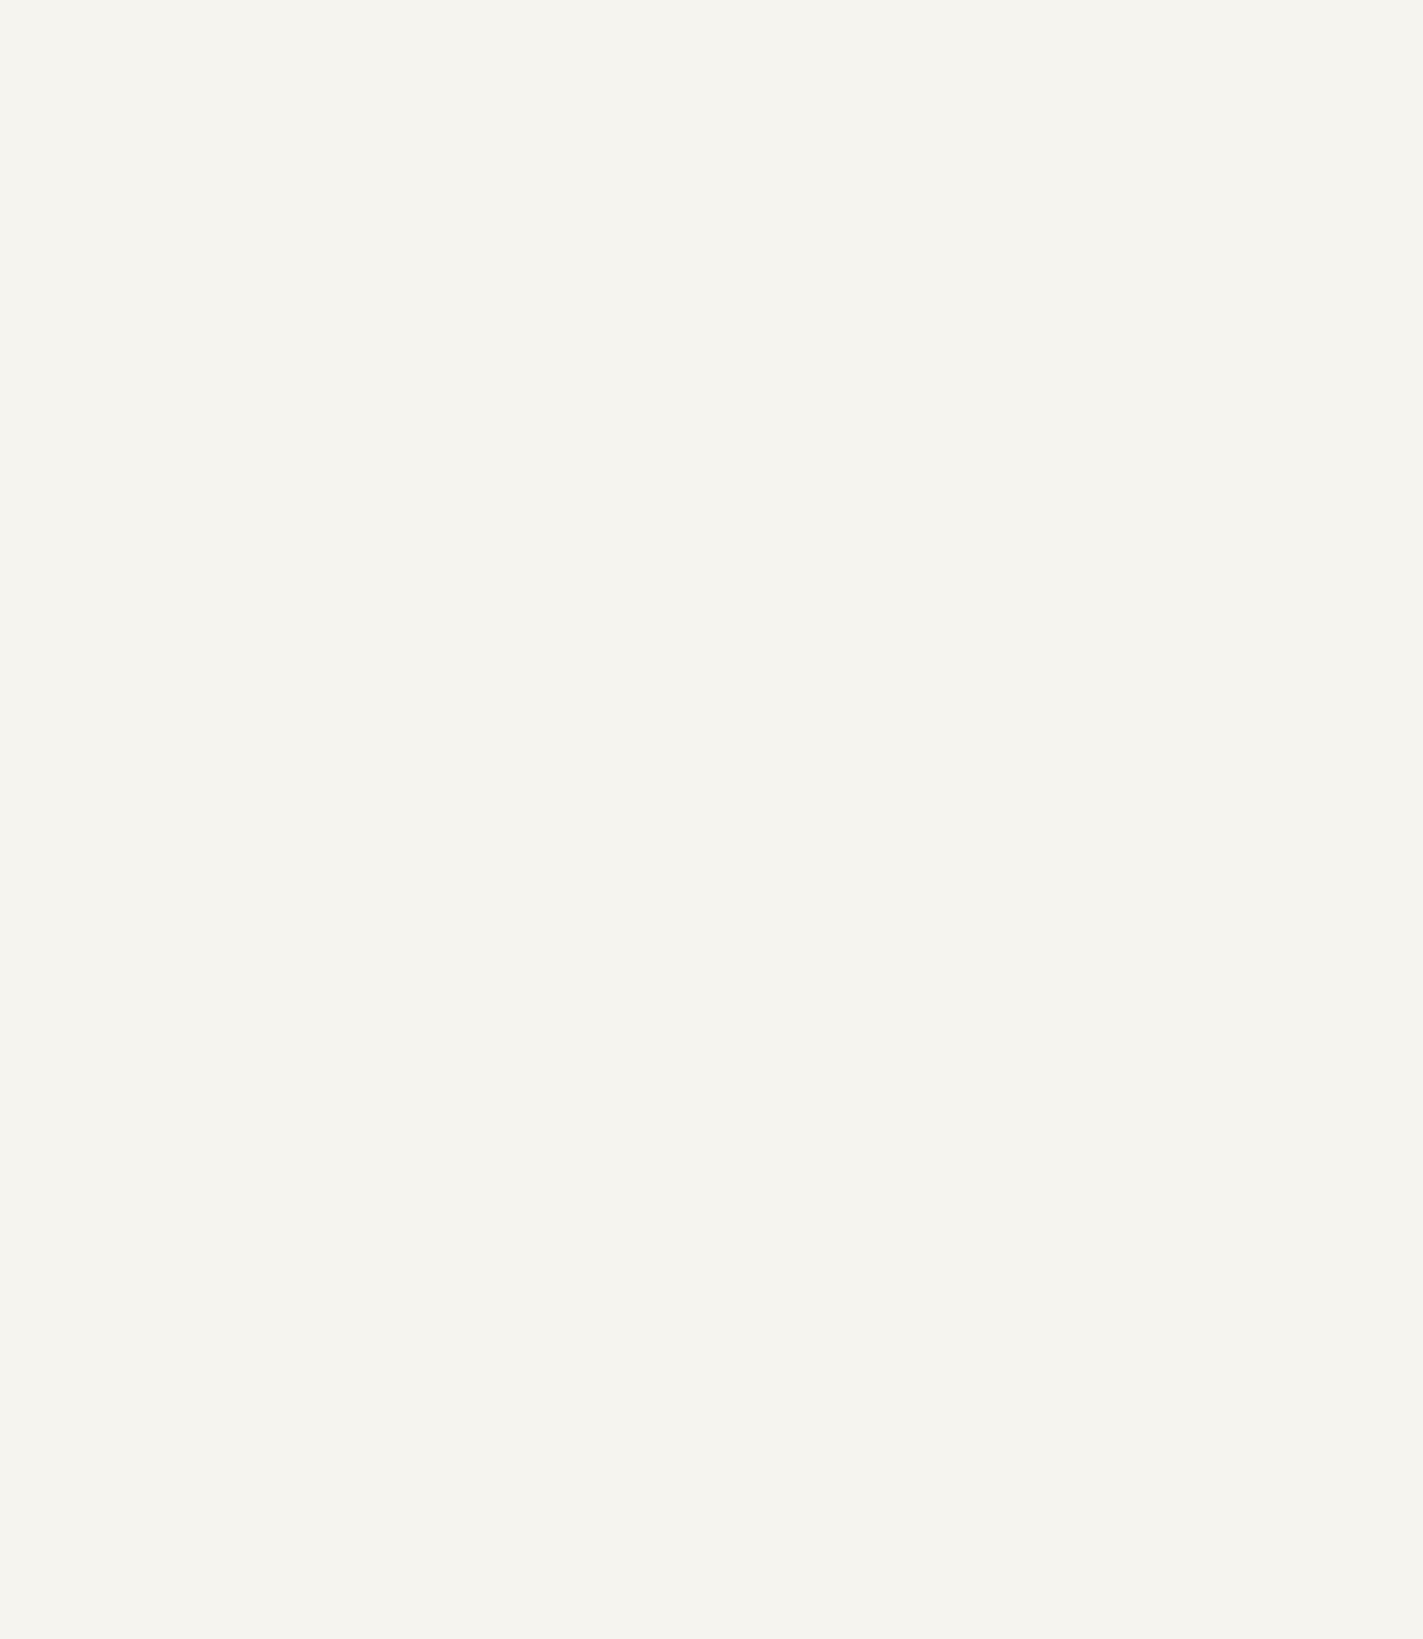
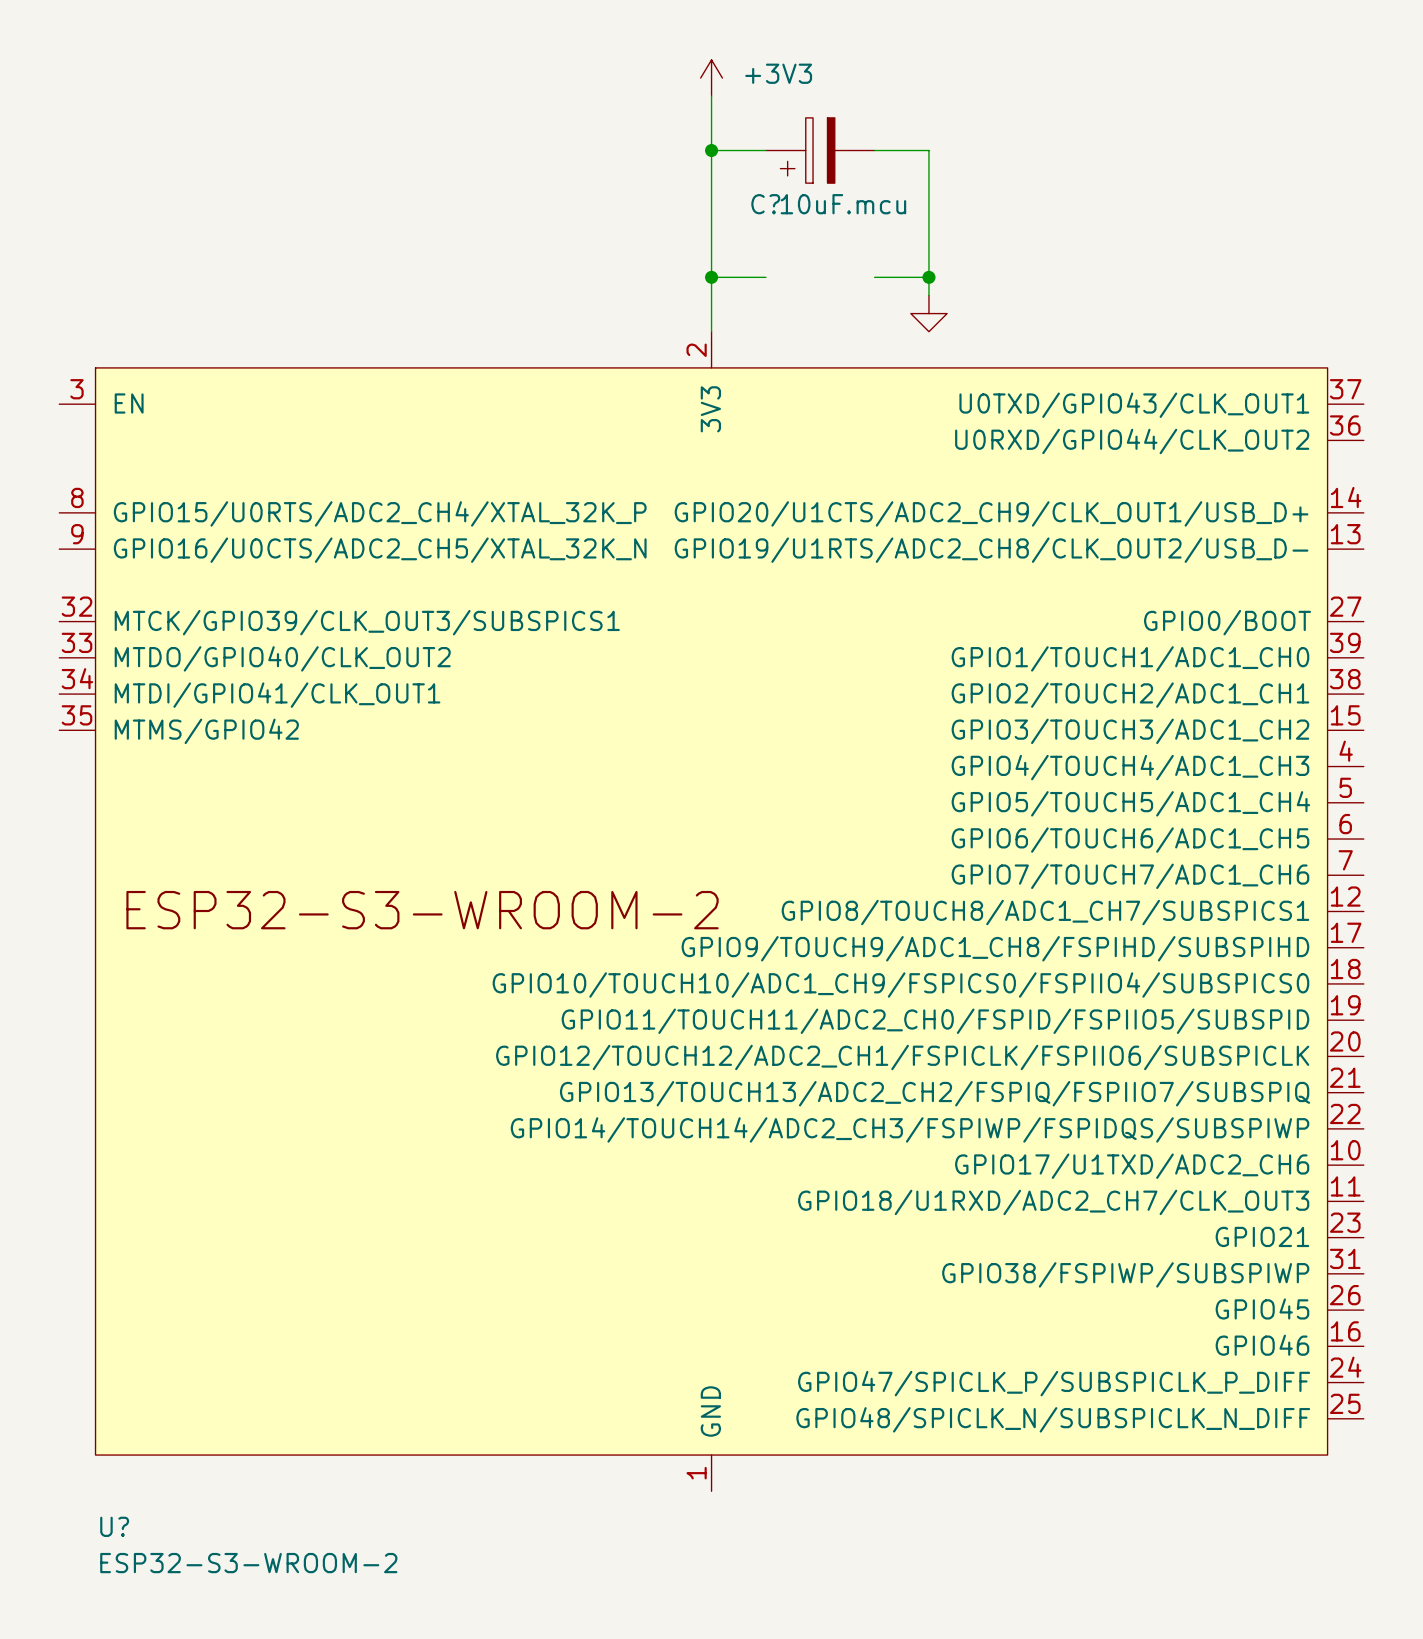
power symbol: none -> +3V3 (711, 78)
wire: none -> (711, 96) (711, 331)
wire: none -> (711, 150) (765, 150)
junction: none -> (711, 150)
C?: none -> 10uF.mcu (820, 150)
wire: none -> (874, 150) (928, 150) (928, 295)
wire: none -> (711, 277) (765, 277)
junction: none -> (711, 277)
wire: none -> (874, 277) (928, 277)
junction: none -> (928, 277)
power symbol: none -> (928, 313)
U?: none -> ESP32-S3-WROOM-2 (711, 911)

